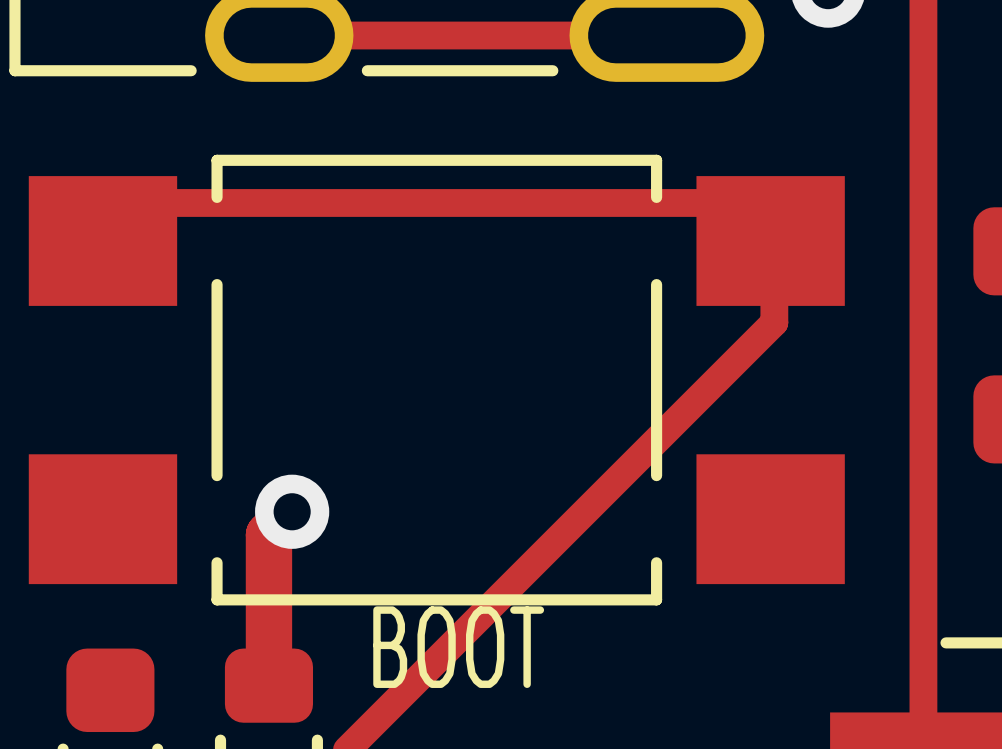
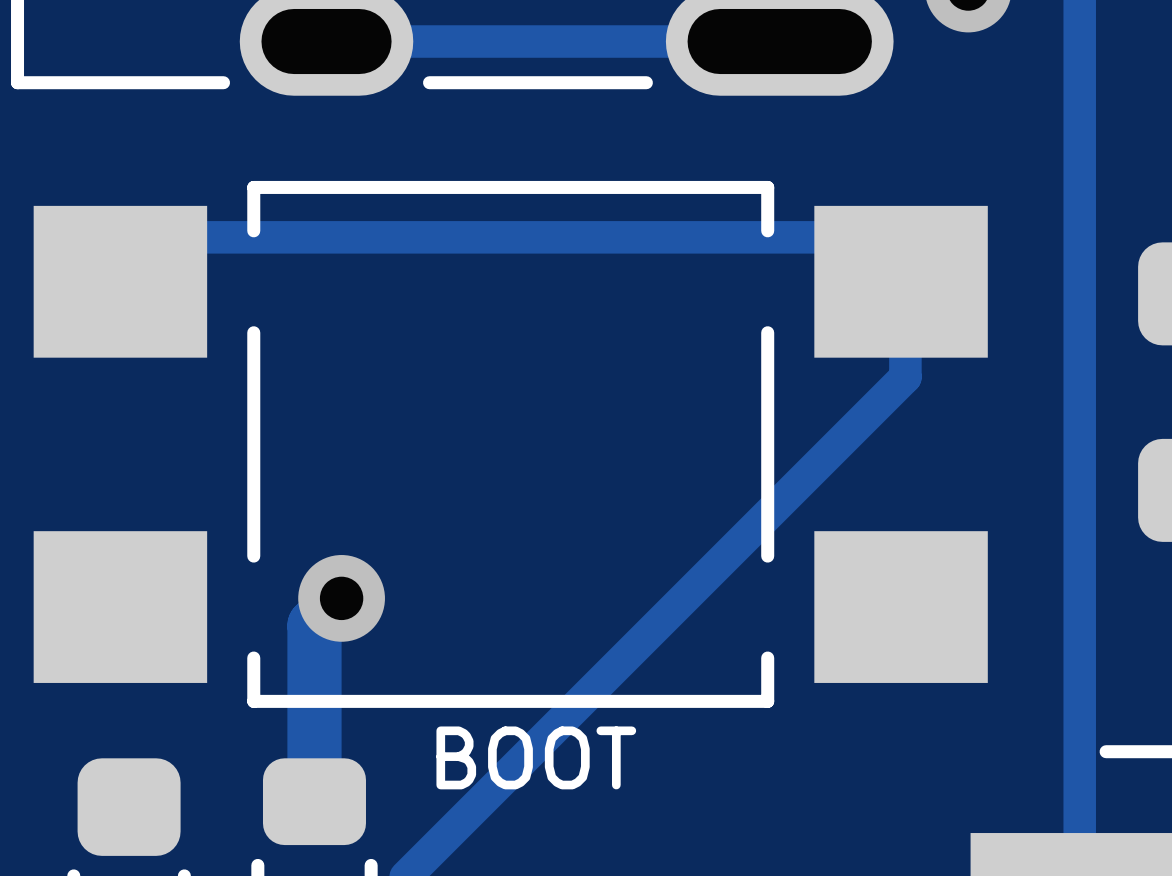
part footprint: [28, 154, 845, 606] -> [33, 180, 988, 708]

